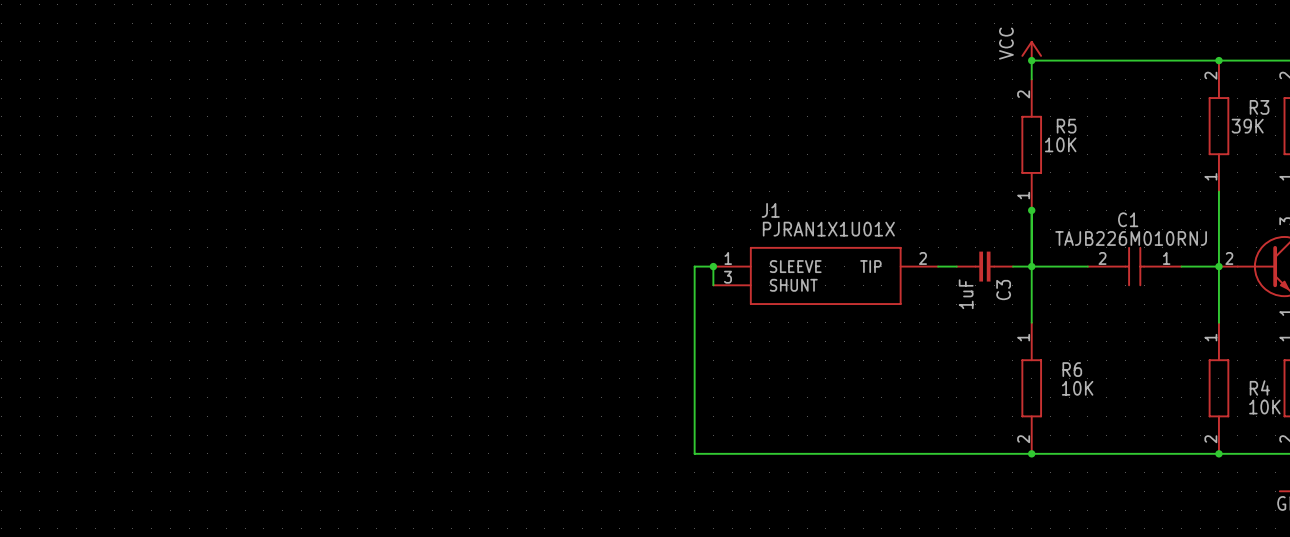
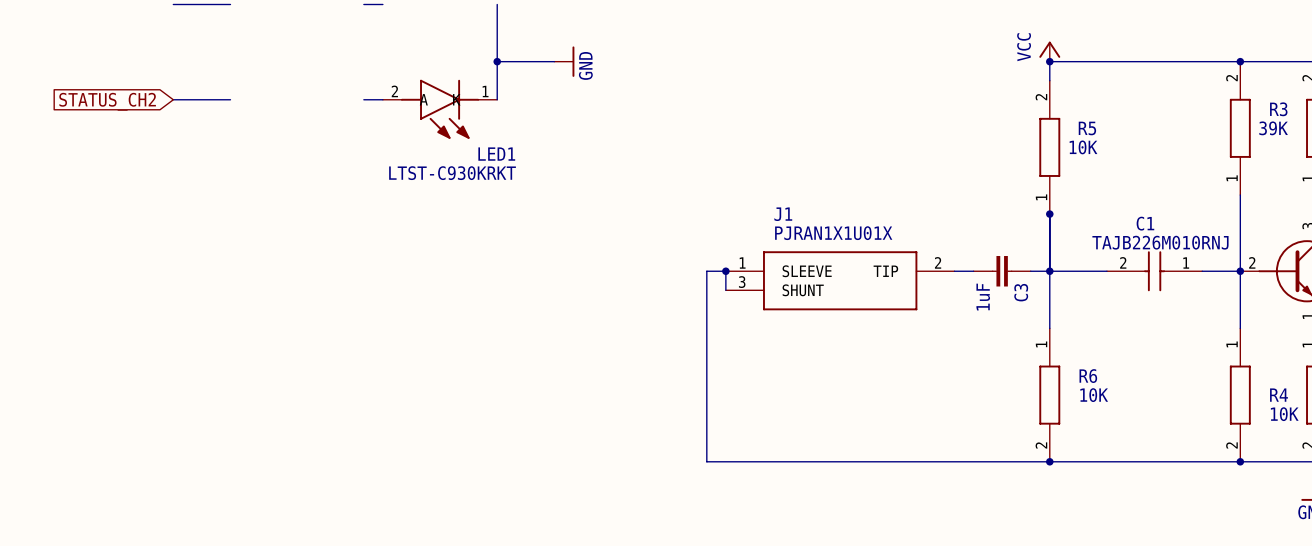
wire: none -> (173, 4) (230, 4)
wire: none -> (363, 4) (382, 4)
wire: none -> (497, 4) (497, 99)
wire: none -> (497, 61) (554, 61)
junction: none -> (497, 61)
power symbol: none -> GND (564, 61)
global label: none -> STATUS_CH2 (107, 101)
wire: none -> (173, 99) (230, 99)
wire: none -> (363, 99) (382, 99)
LED1: none -> LTST-C930KRKT (440, 109)

